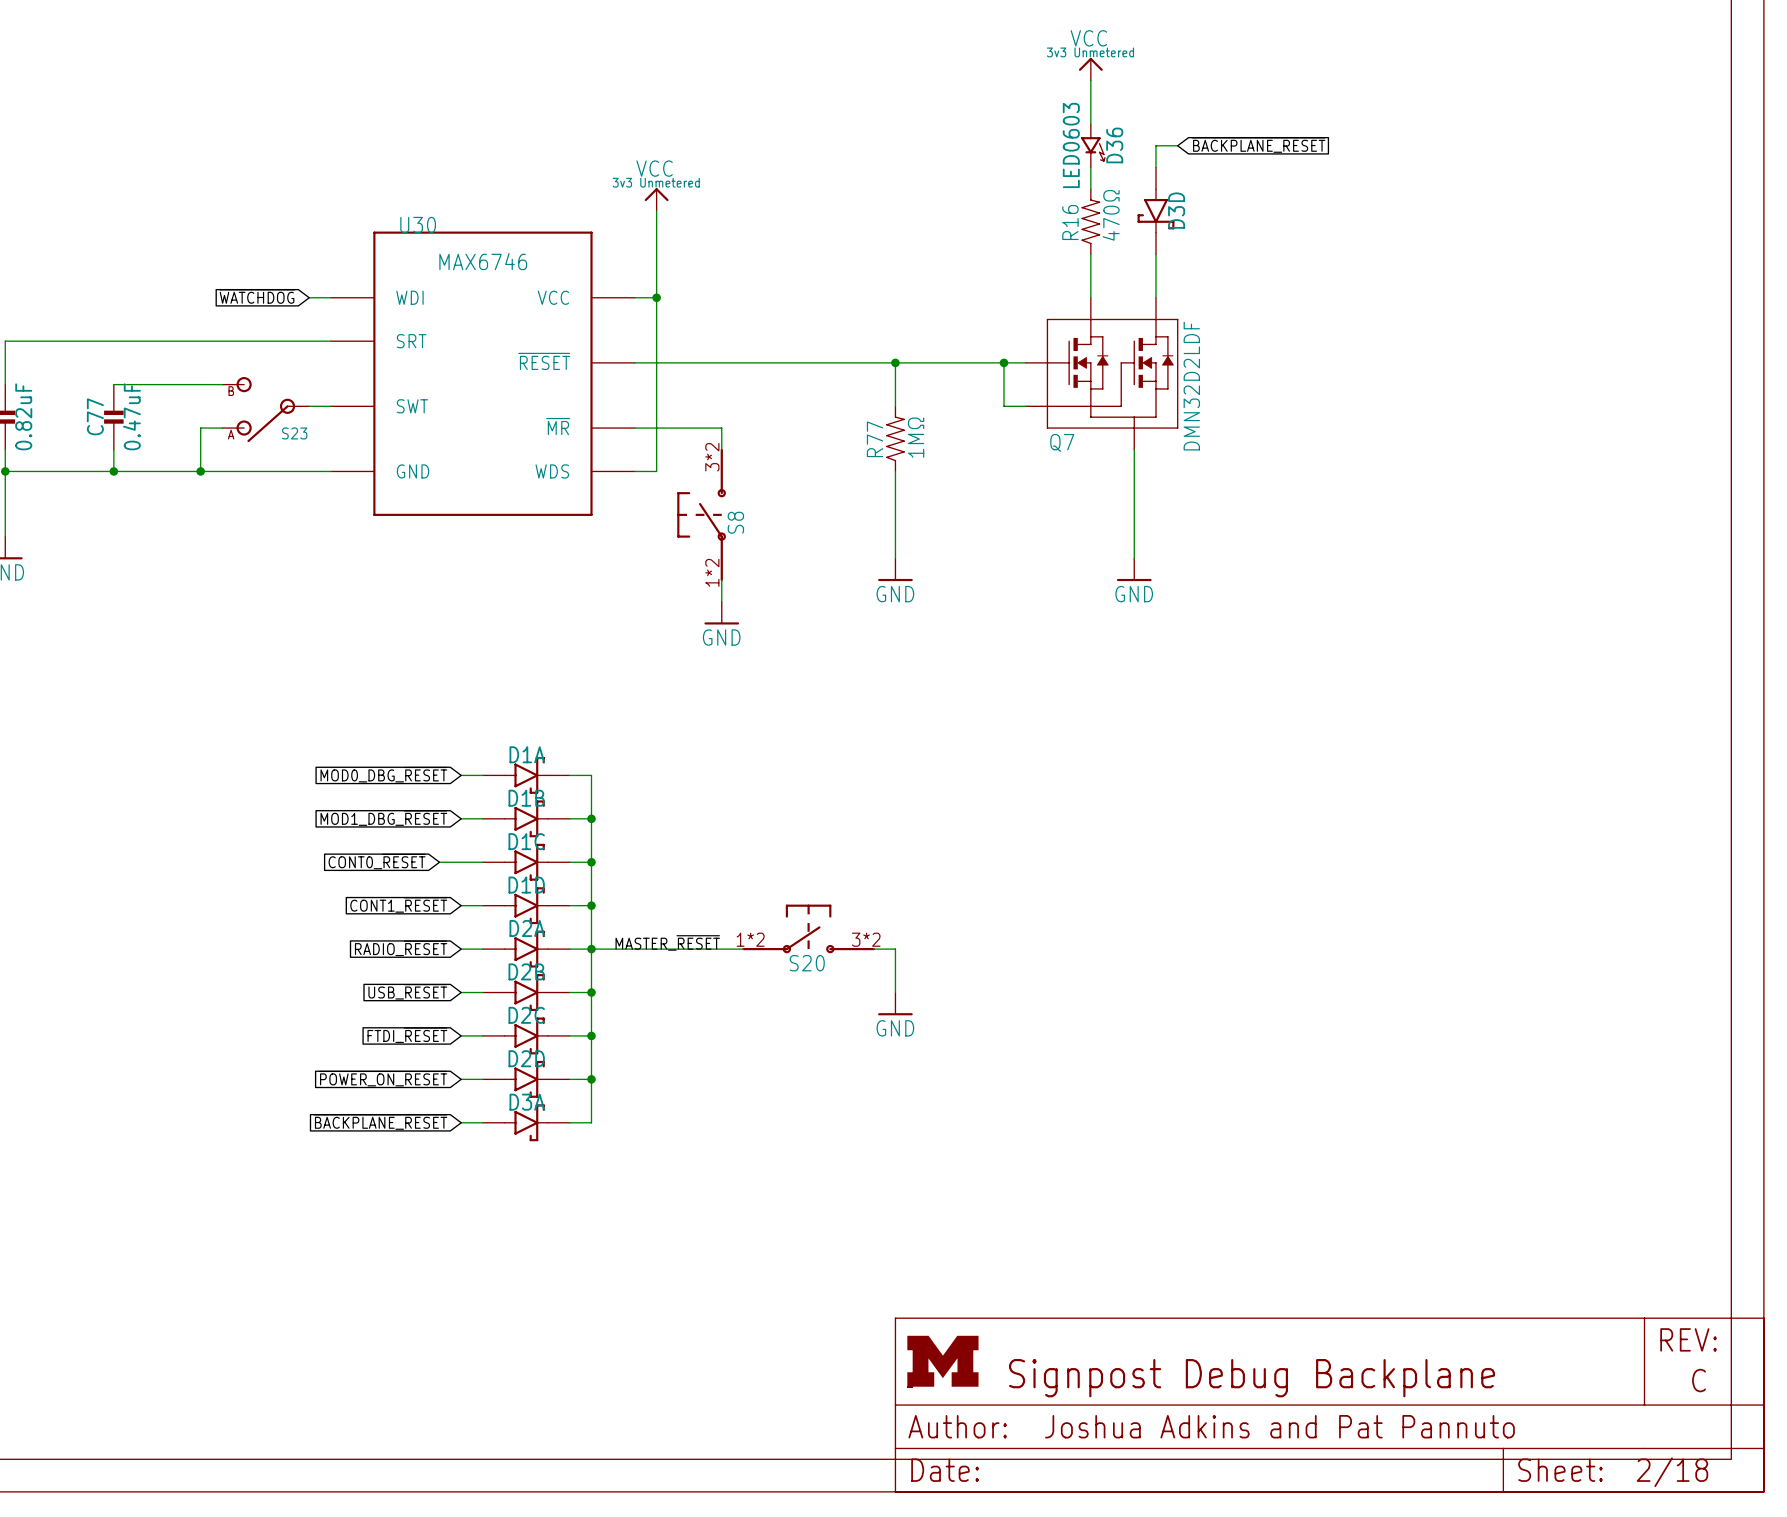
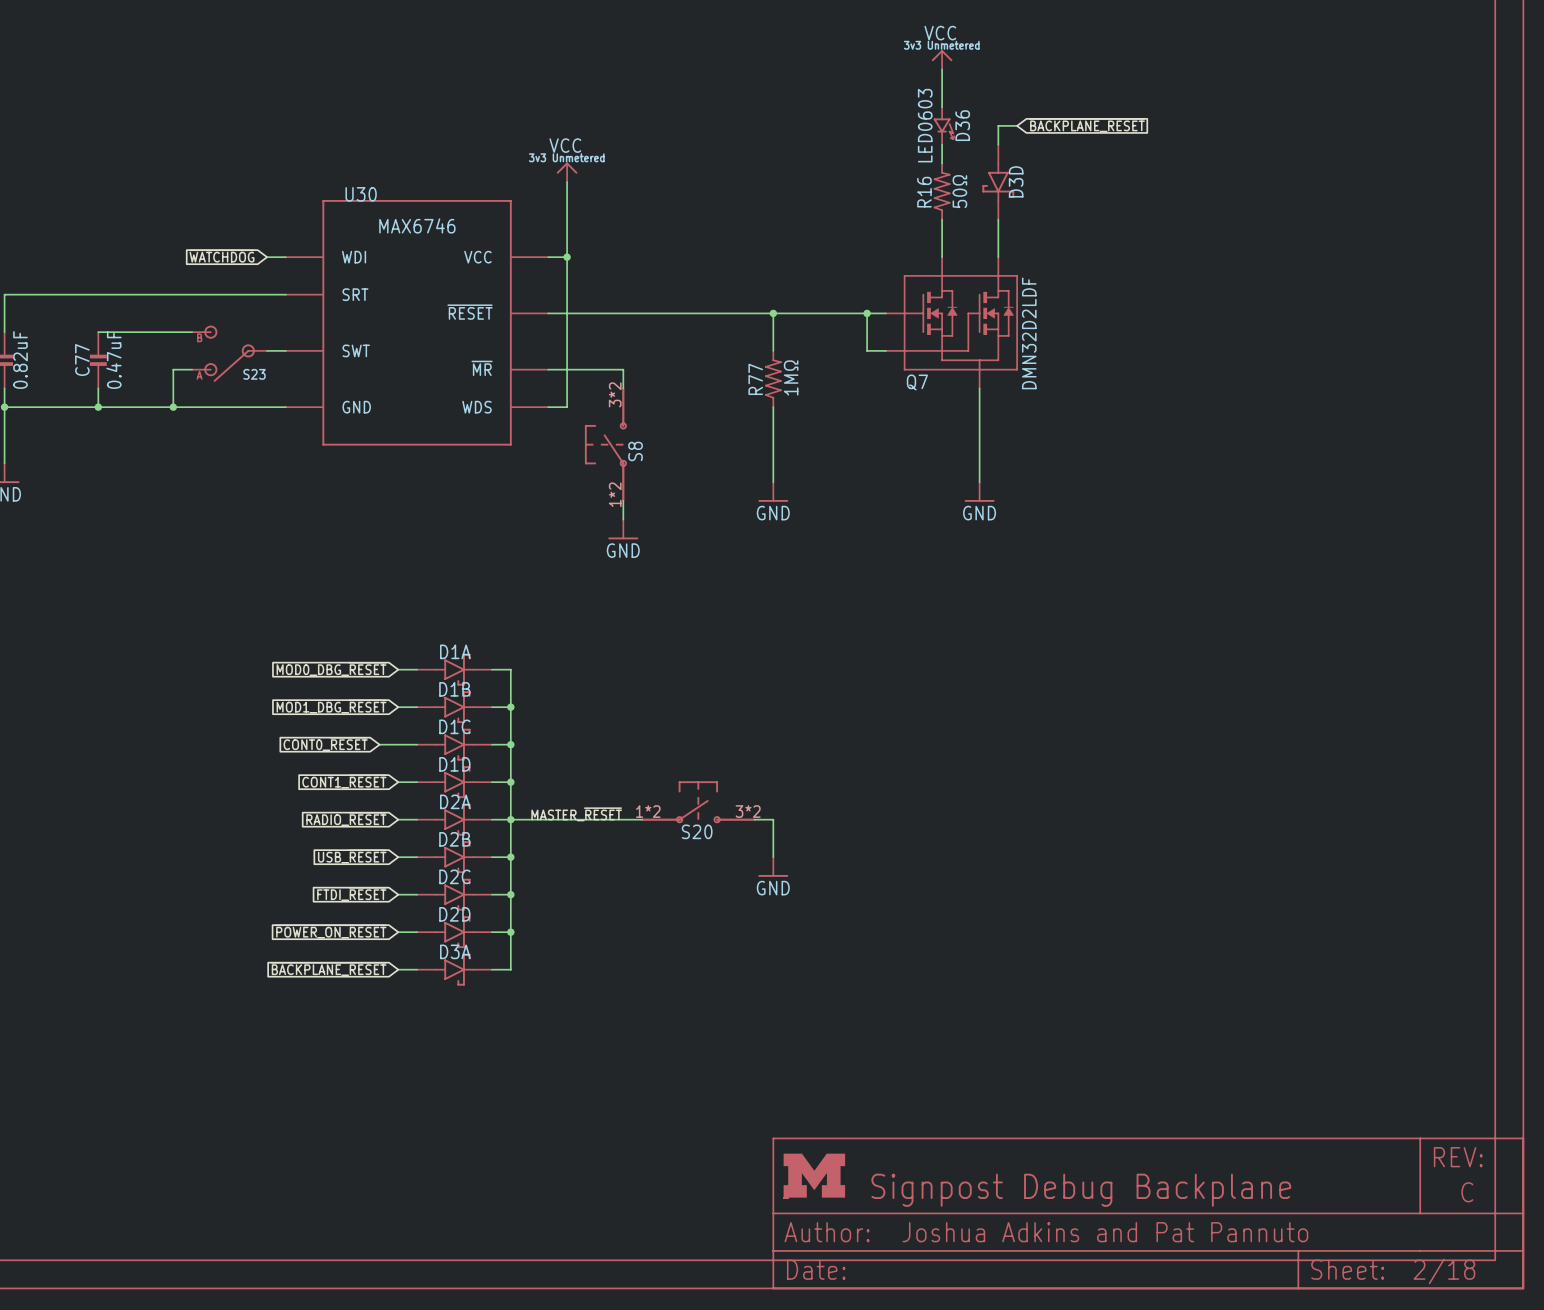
R16 value: 470Ω (1111, 215) -> 50Ω (959, 191)

